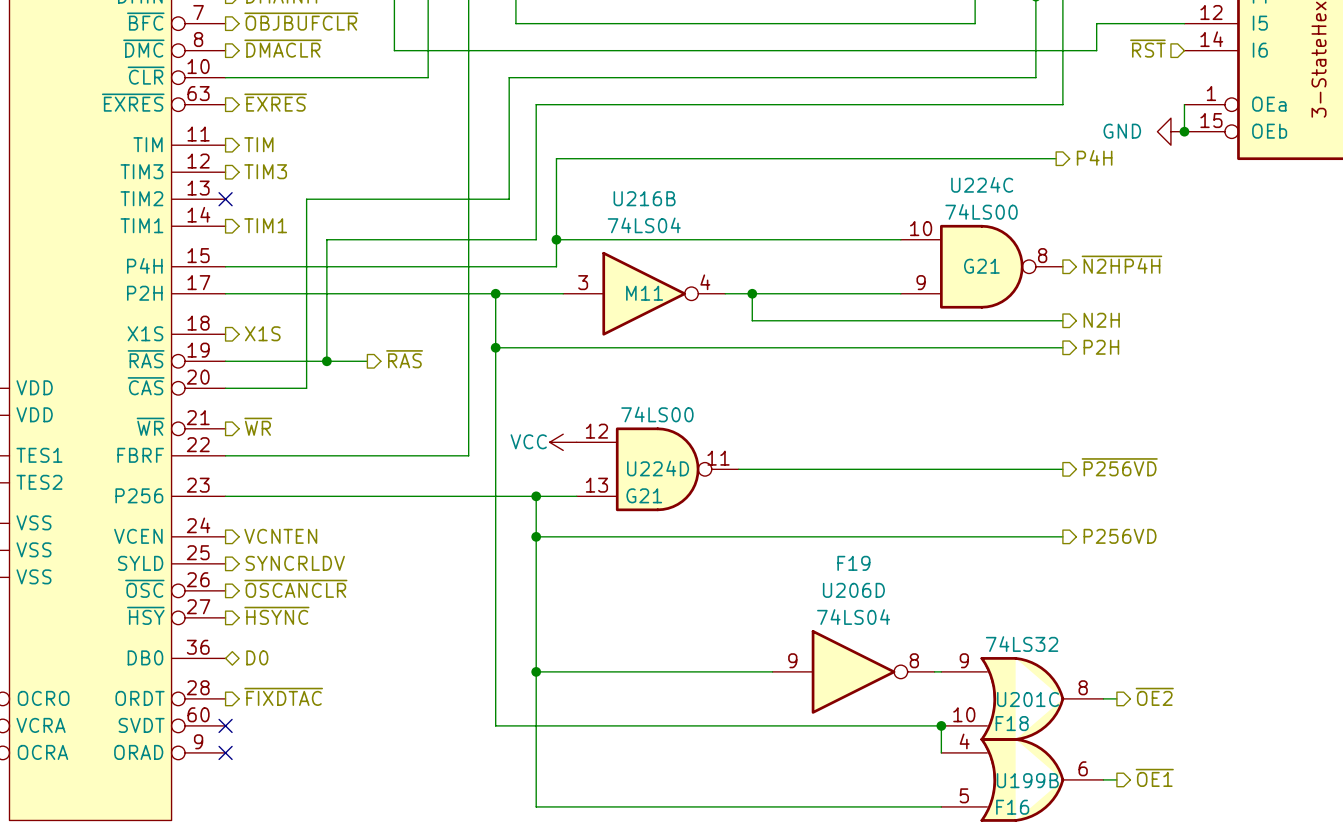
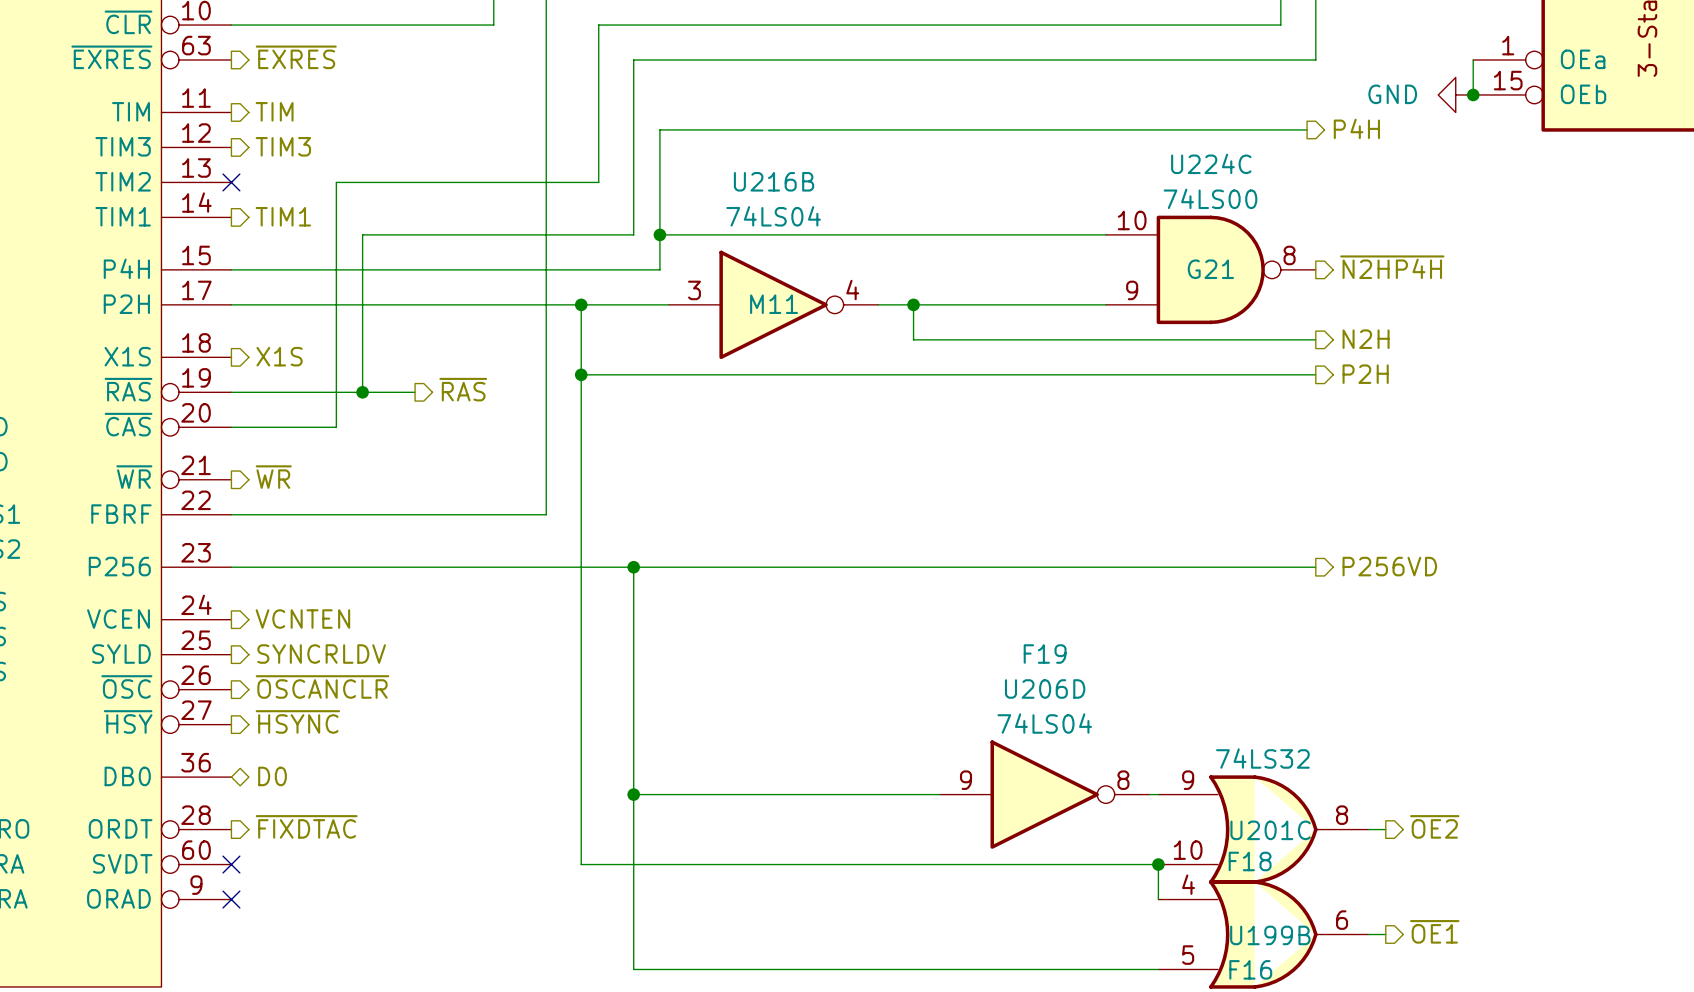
power symbol: VCC (563, 442) -> none
hierarchical label: ~{P256VD} (1119, 467) -> none
U224D: 74LS00 (657, 469) -> none
wire: (738, 469) (1062, 469) -> none
wire: none -> (686, 567) (1315, 567)
wire: (536, 536) (1062, 536) -> none
junction: (536, 536) -> none
hierarchical label position: P256VD (1120, 536) -> P256VD (1389, 566)

